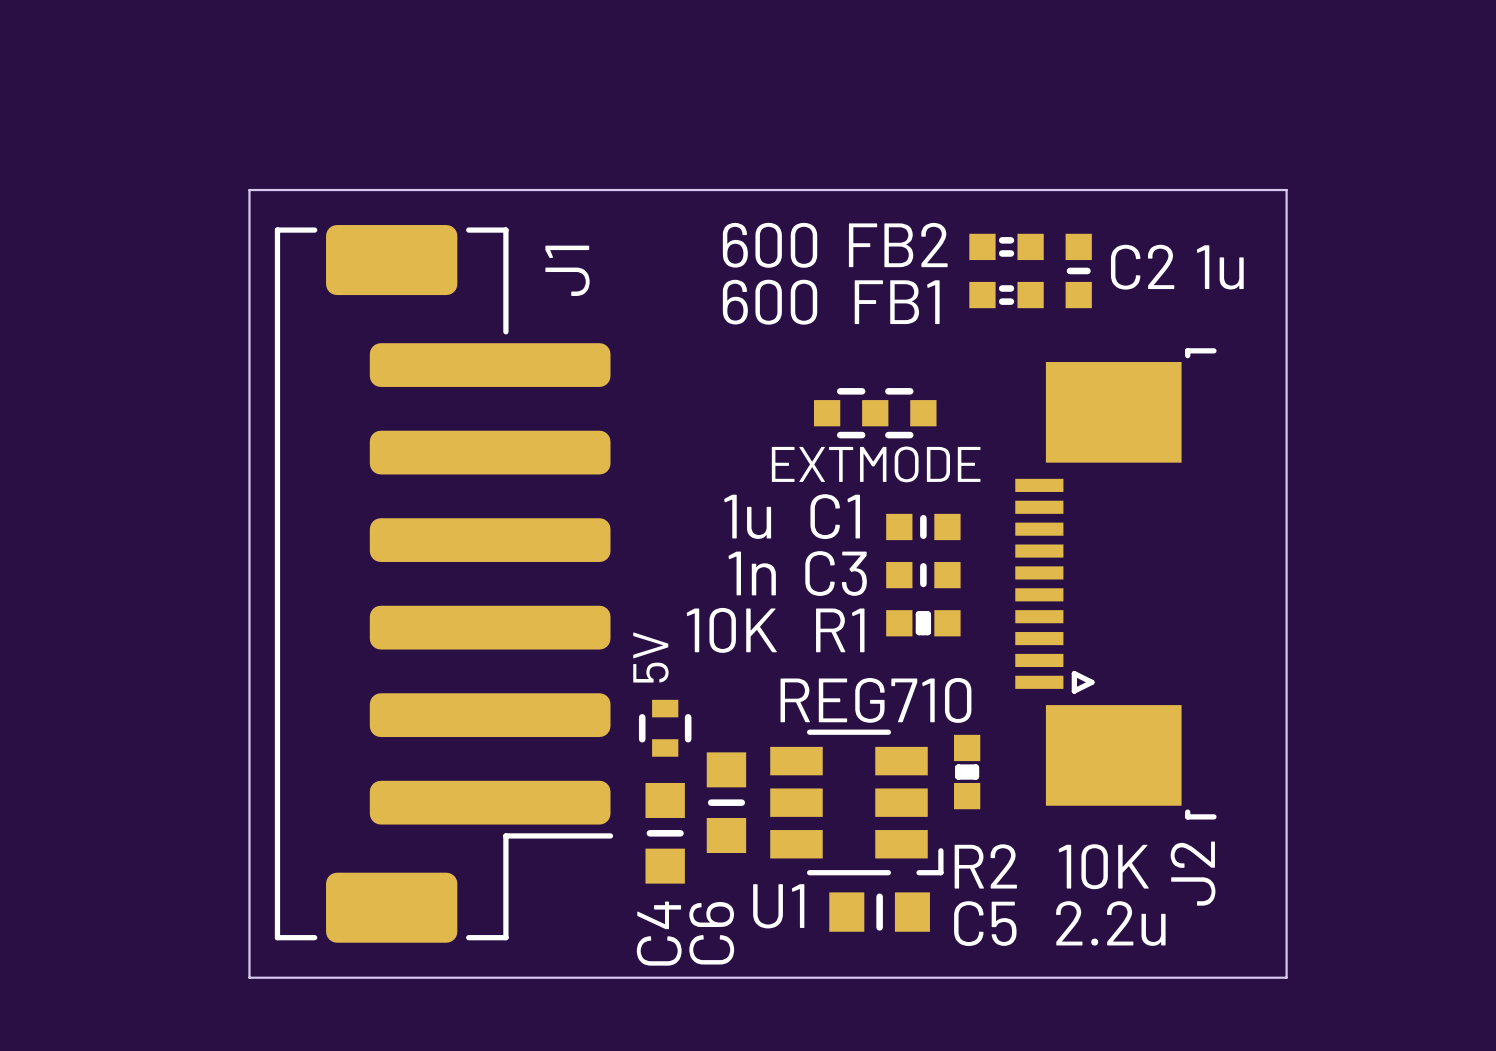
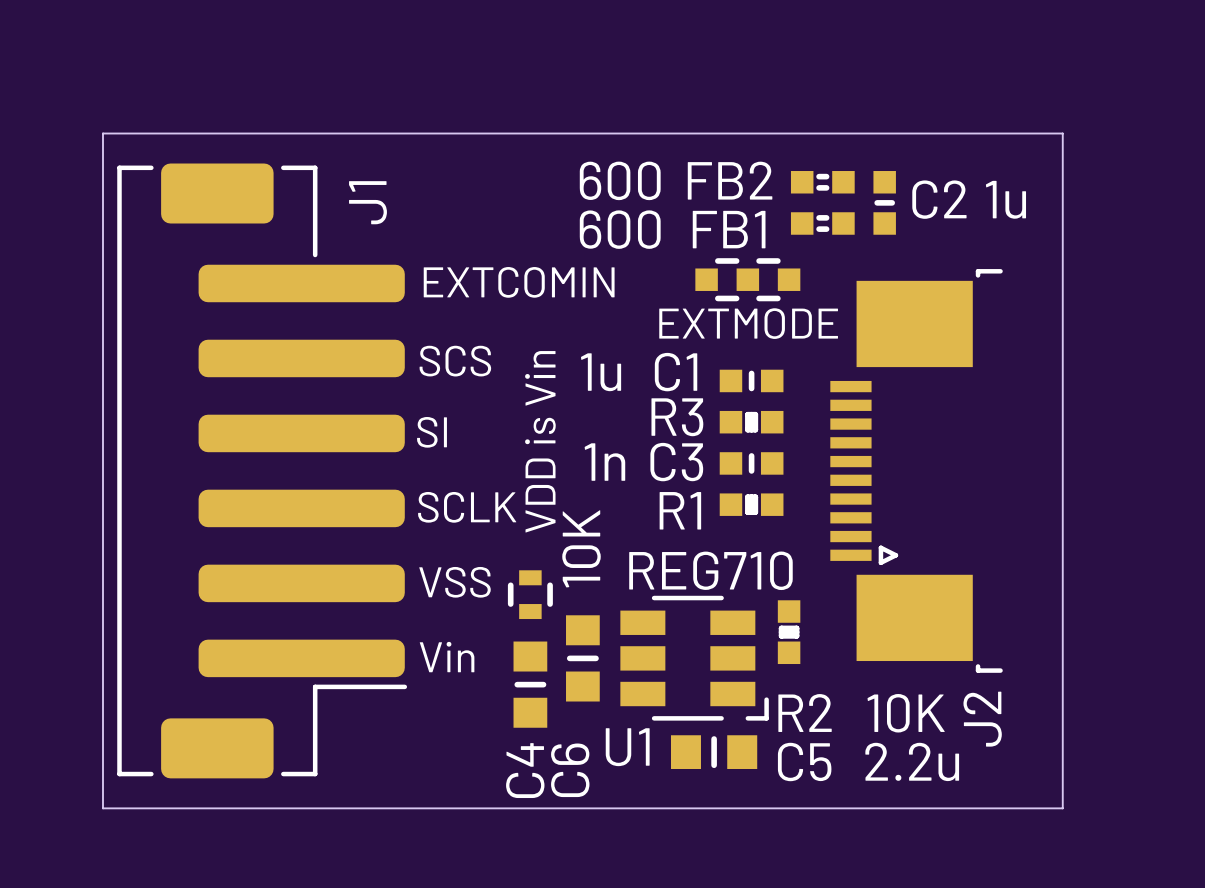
board edge: (249, 190) (249, 977) -> (174, 133) (102, 133) (102, 808) (174, 808)
text: none -> EXTCOMIN (519, 282)
part position: (875, 413) -> (747, 279)
text: none -> SCS (455, 361)
C1 position: (923, 526) -> (751, 380)
R3: none -> (751, 422)
text: none -> SI (432, 432)
J1 position: (443, 583) -> (262, 470)
text: none -> SCLK (467, 507)
R1 value rotation: 0° (731, 630) -> 90° counterclockwise (581, 548)
part value: 5V (650, 657) -> VDD is Vin (540, 441)
text: none -> VSS (455, 582)
text: none -> Vin (447, 657)

